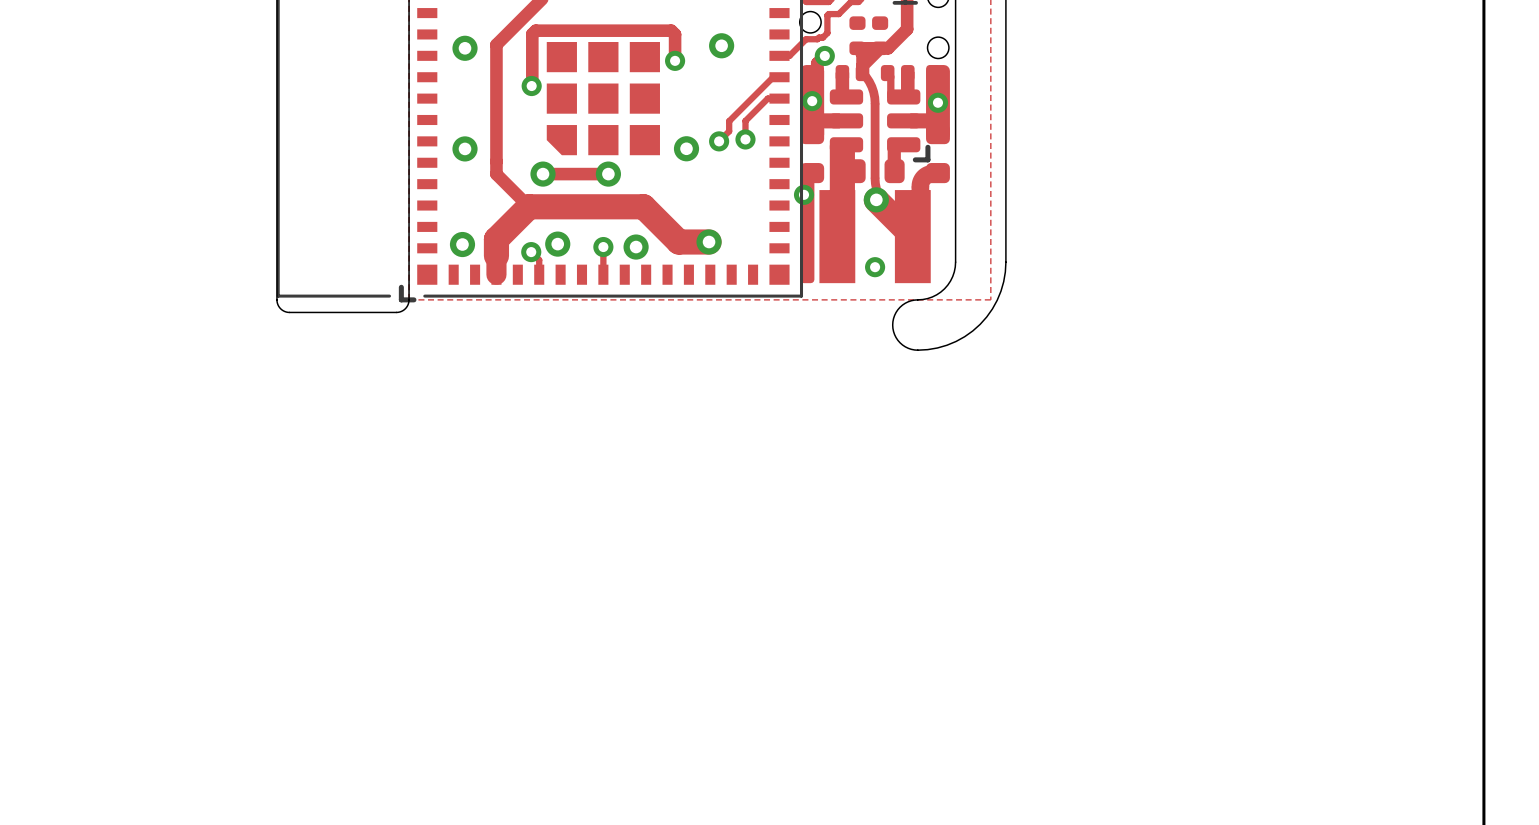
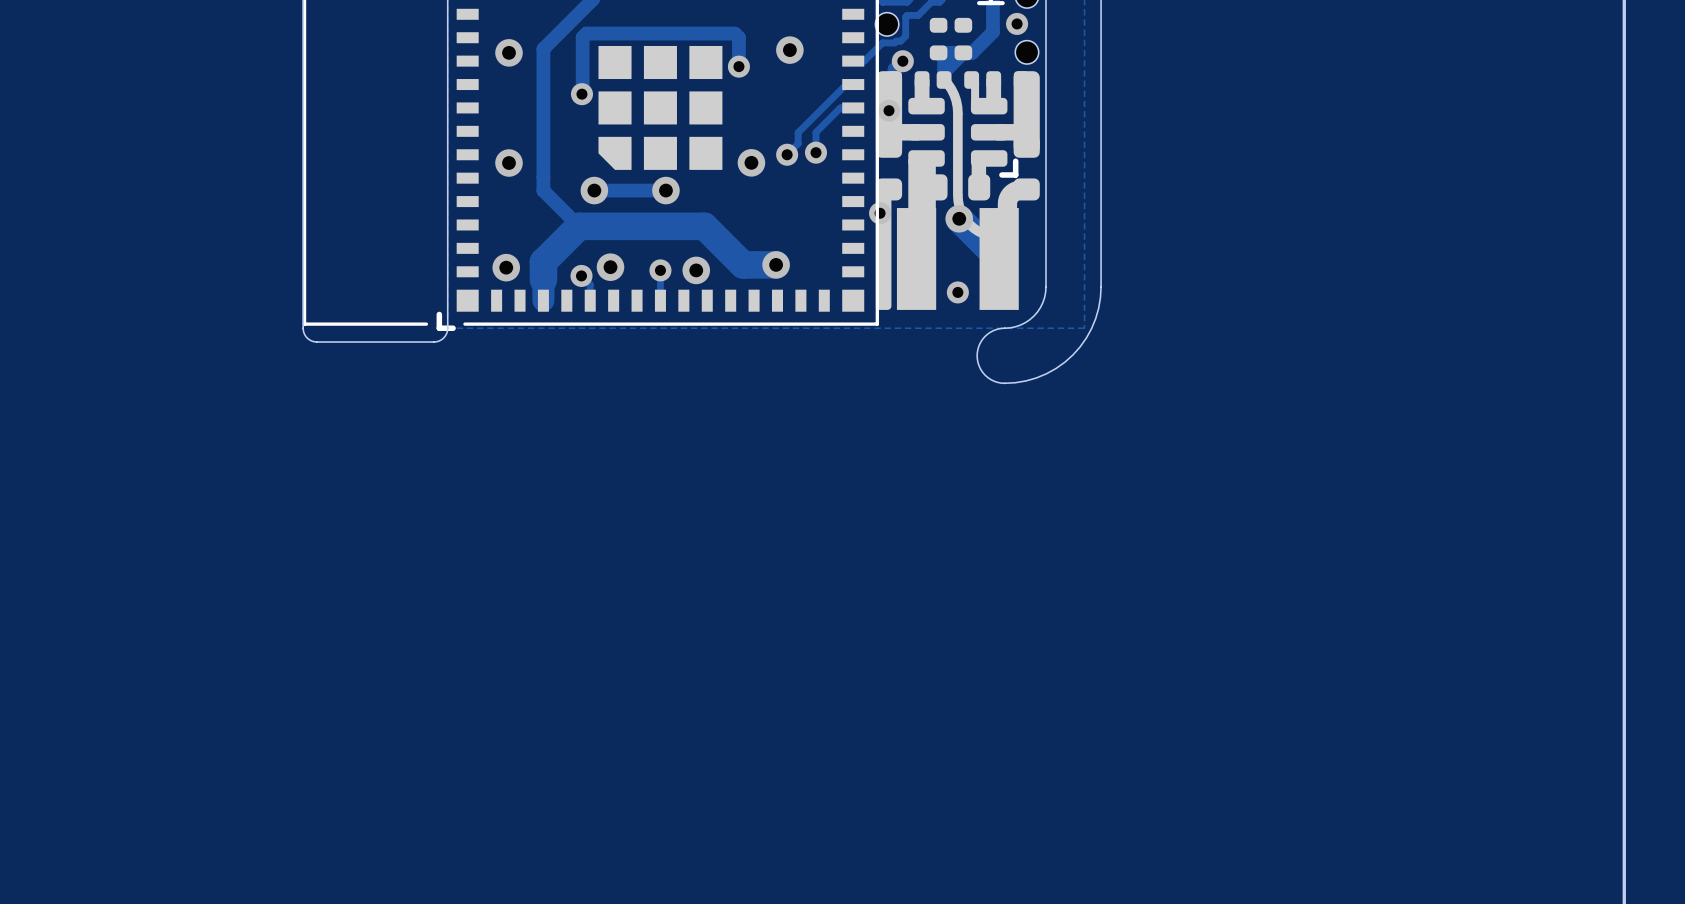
via position: (937, 102) -> (1017, 23)

